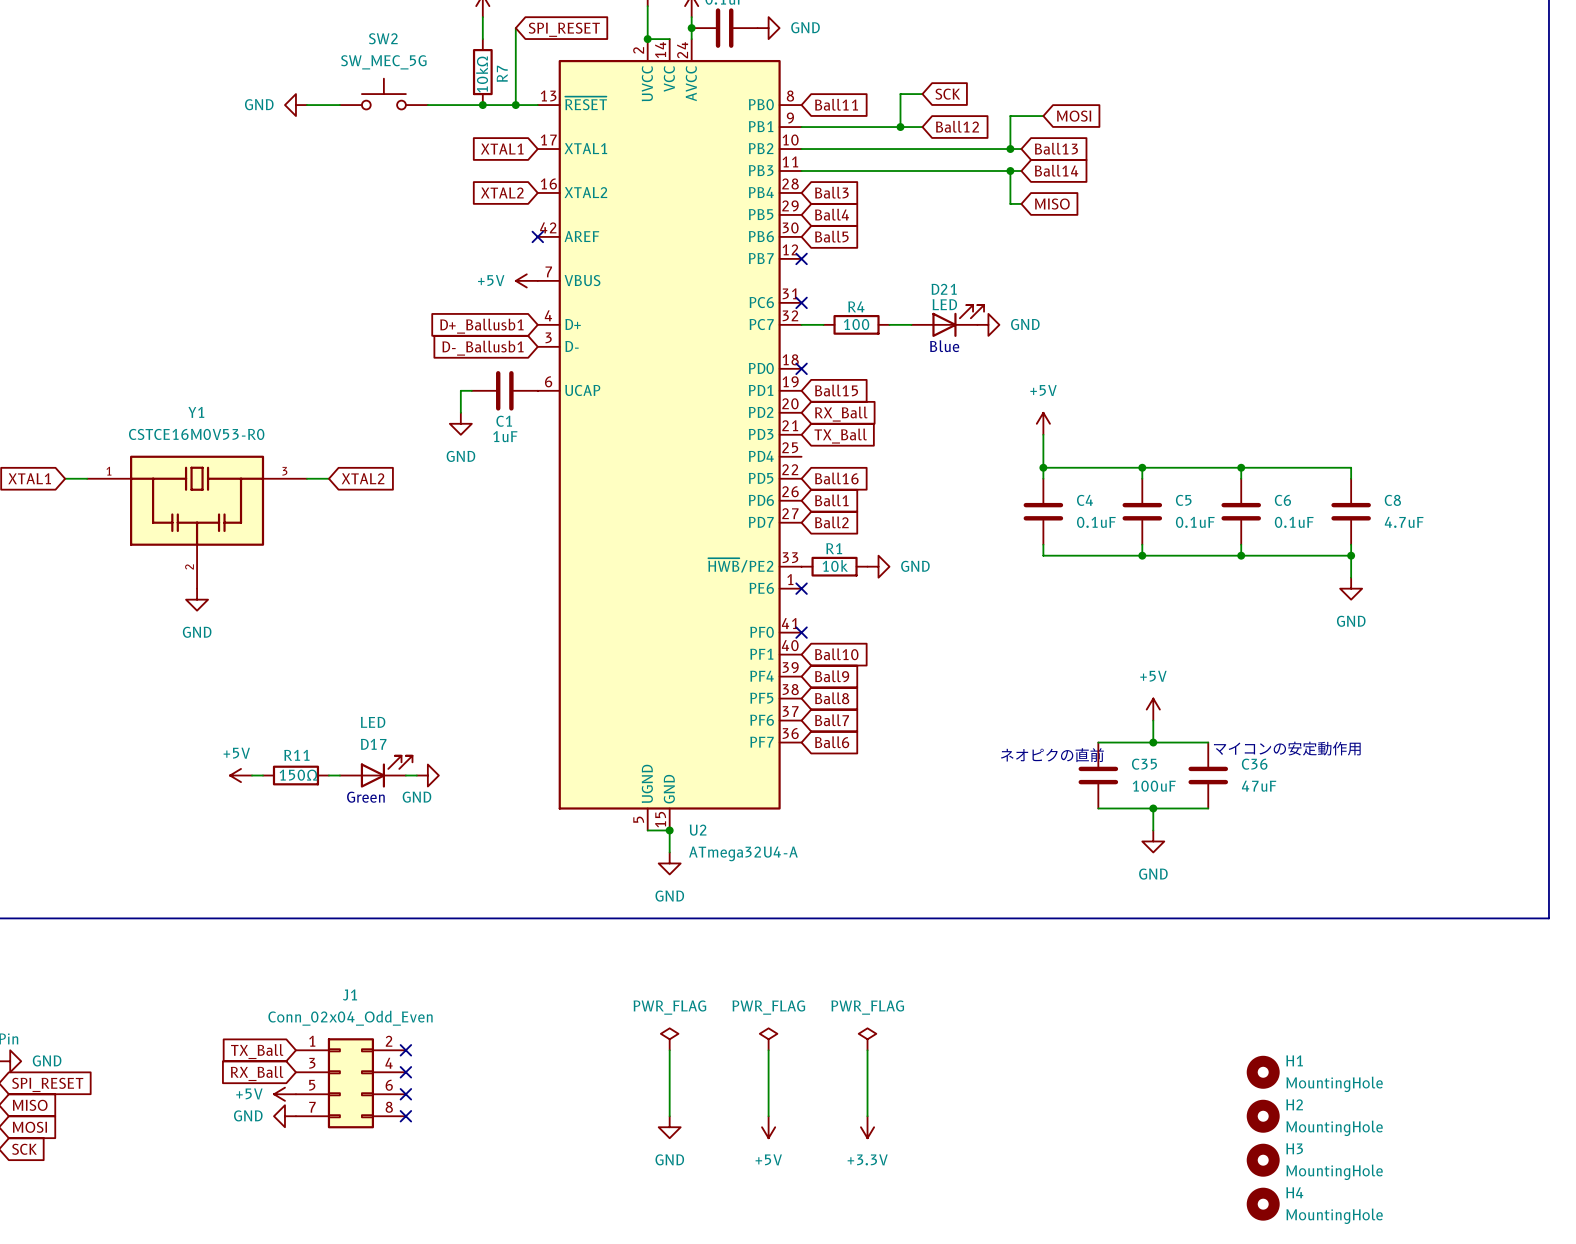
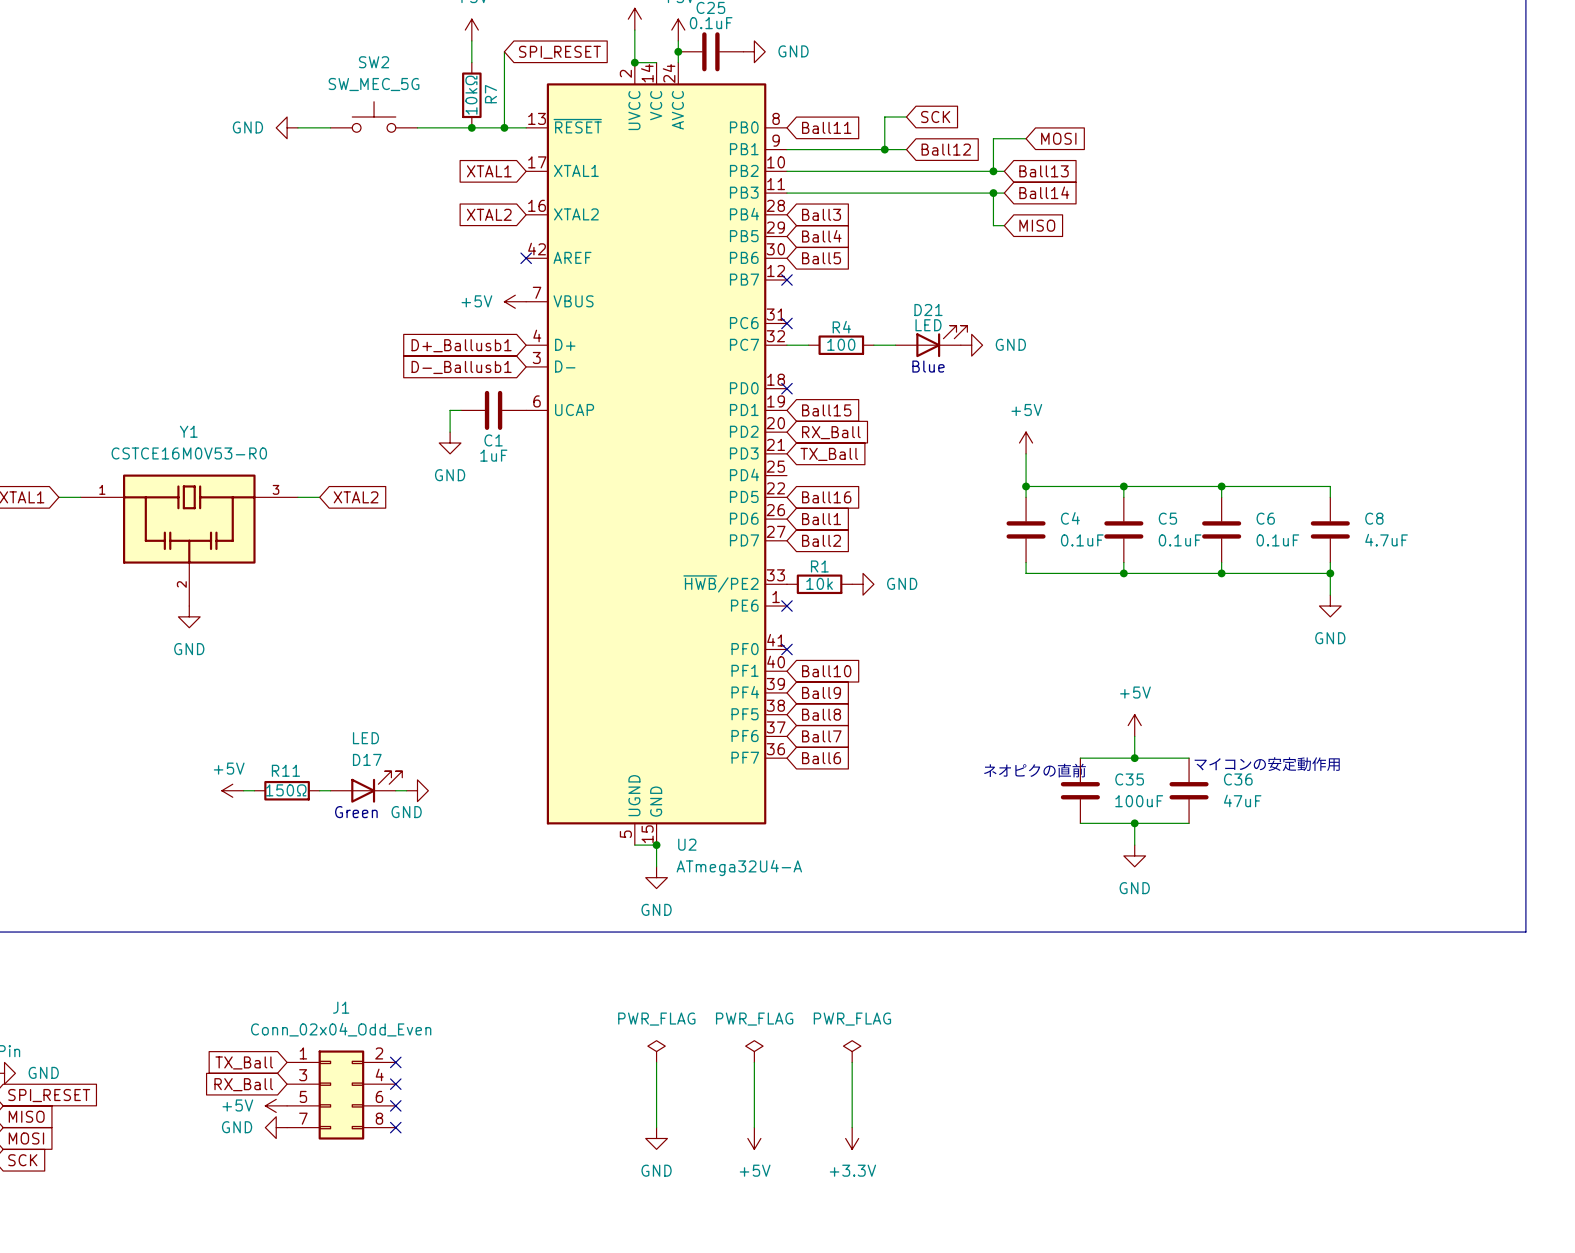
H1: MountingHole (1263, 1072) -> none
H2: MountingHole (1263, 1116) -> none
H3: MountingHole (1263, 1160) -> none
H4: MountingHole (1263, 1204) -> none

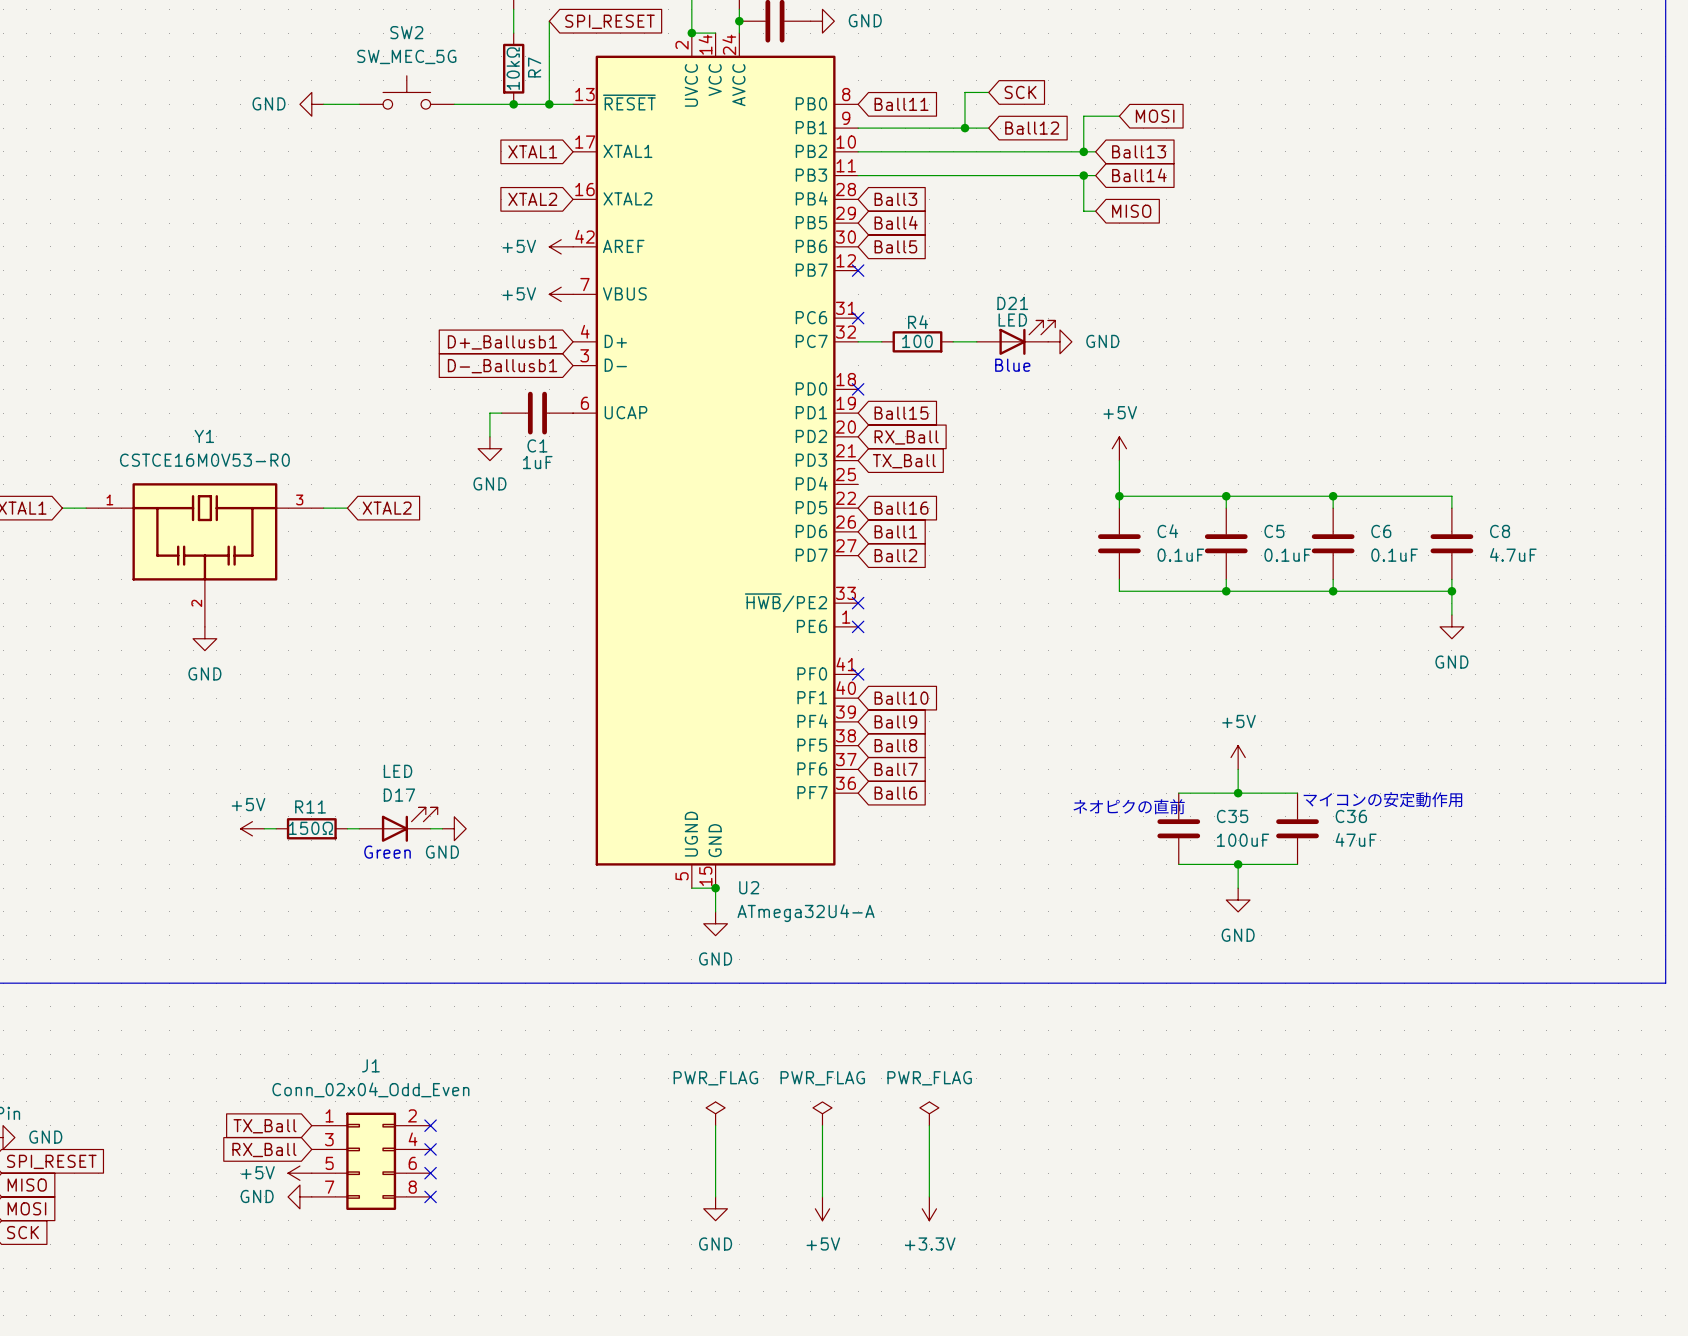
power symbol: none -> +5V (561, 246)
no-connect mark: (526, 258) -> none
no-connect mark: none -> (858, 603)
R1: 10k (819, 584) -> none
power symbol: GND (863, 584) -> none

